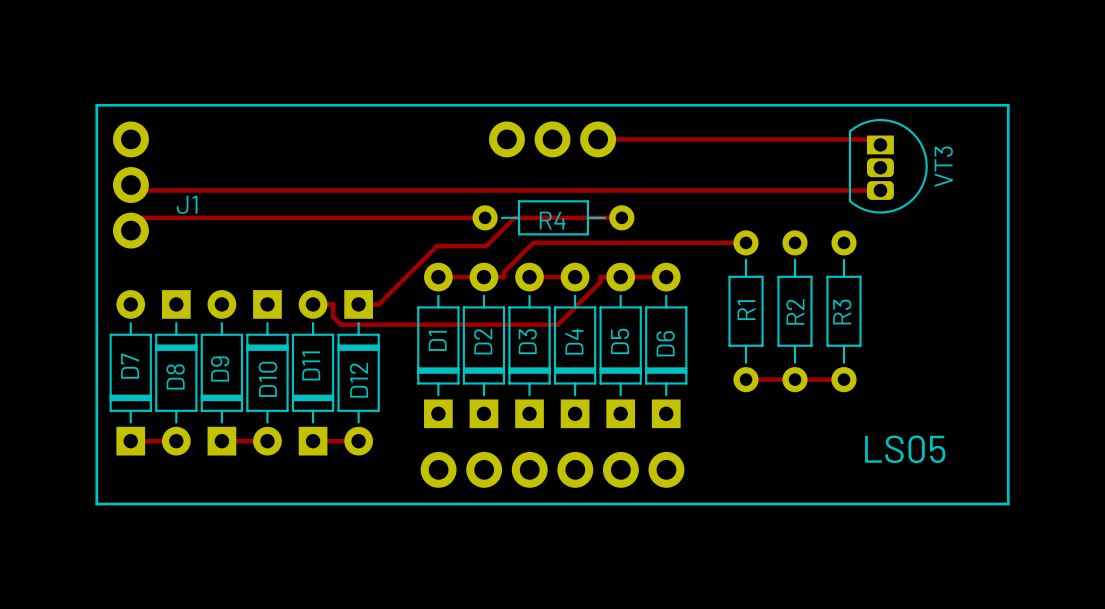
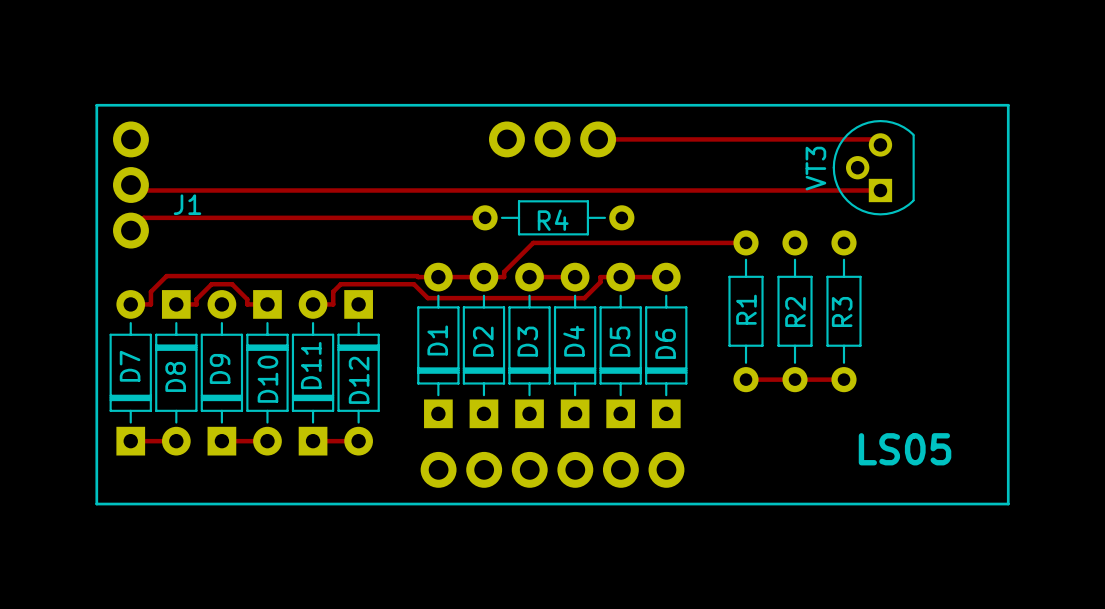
VT3 footprint: [848, 118, 928, 214] -> [832, 119, 915, 216]
VT3 name position: VT3 (943, 166) -> VT3 (815, 168)
track: (621, 217) (514, 217) (486, 246) (437, 246) (378, 304) (358, 304) -> none
track: none -> (438, 277) (166, 276) (150, 291) (150, 304) (130, 304)
track: (584, 298) (558, 324) (340, 324) (333, 317) (333, 304) -> (584, 298) (427, 298) (413, 284) (340, 284) (333, 291) (333, 304)
track: none -> (176, 304) (196, 304) (196, 299) (211, 284) (232, 284) (247, 299) (247, 304) (267, 304)

